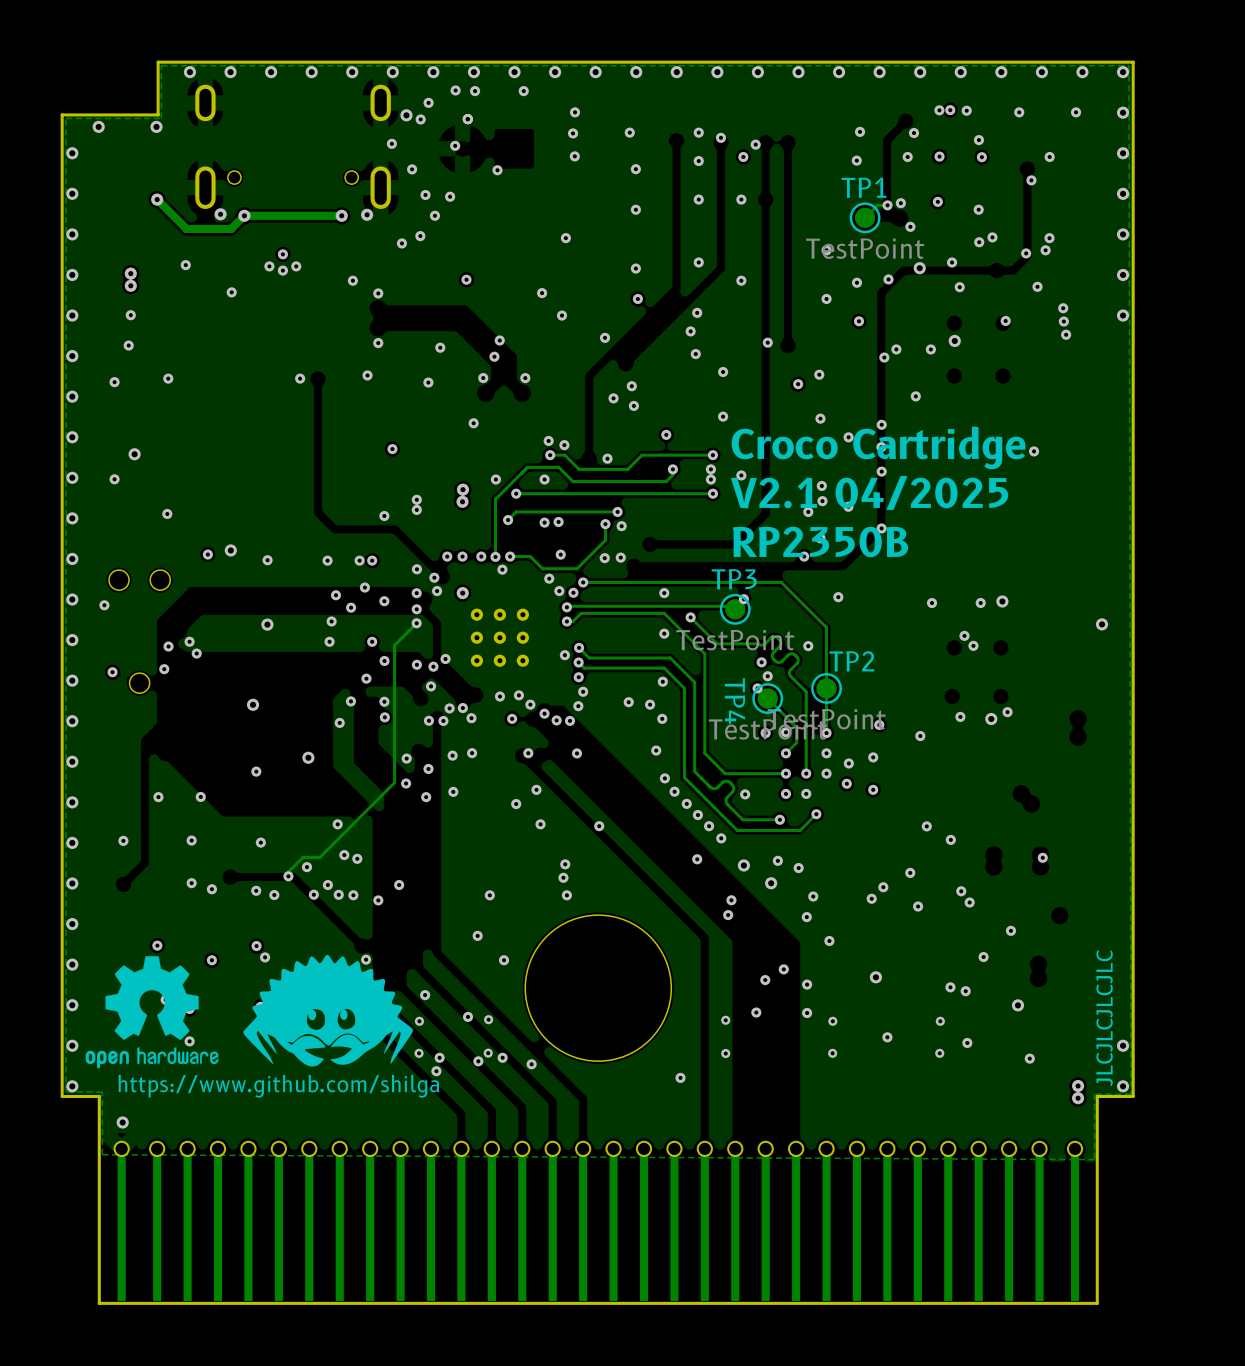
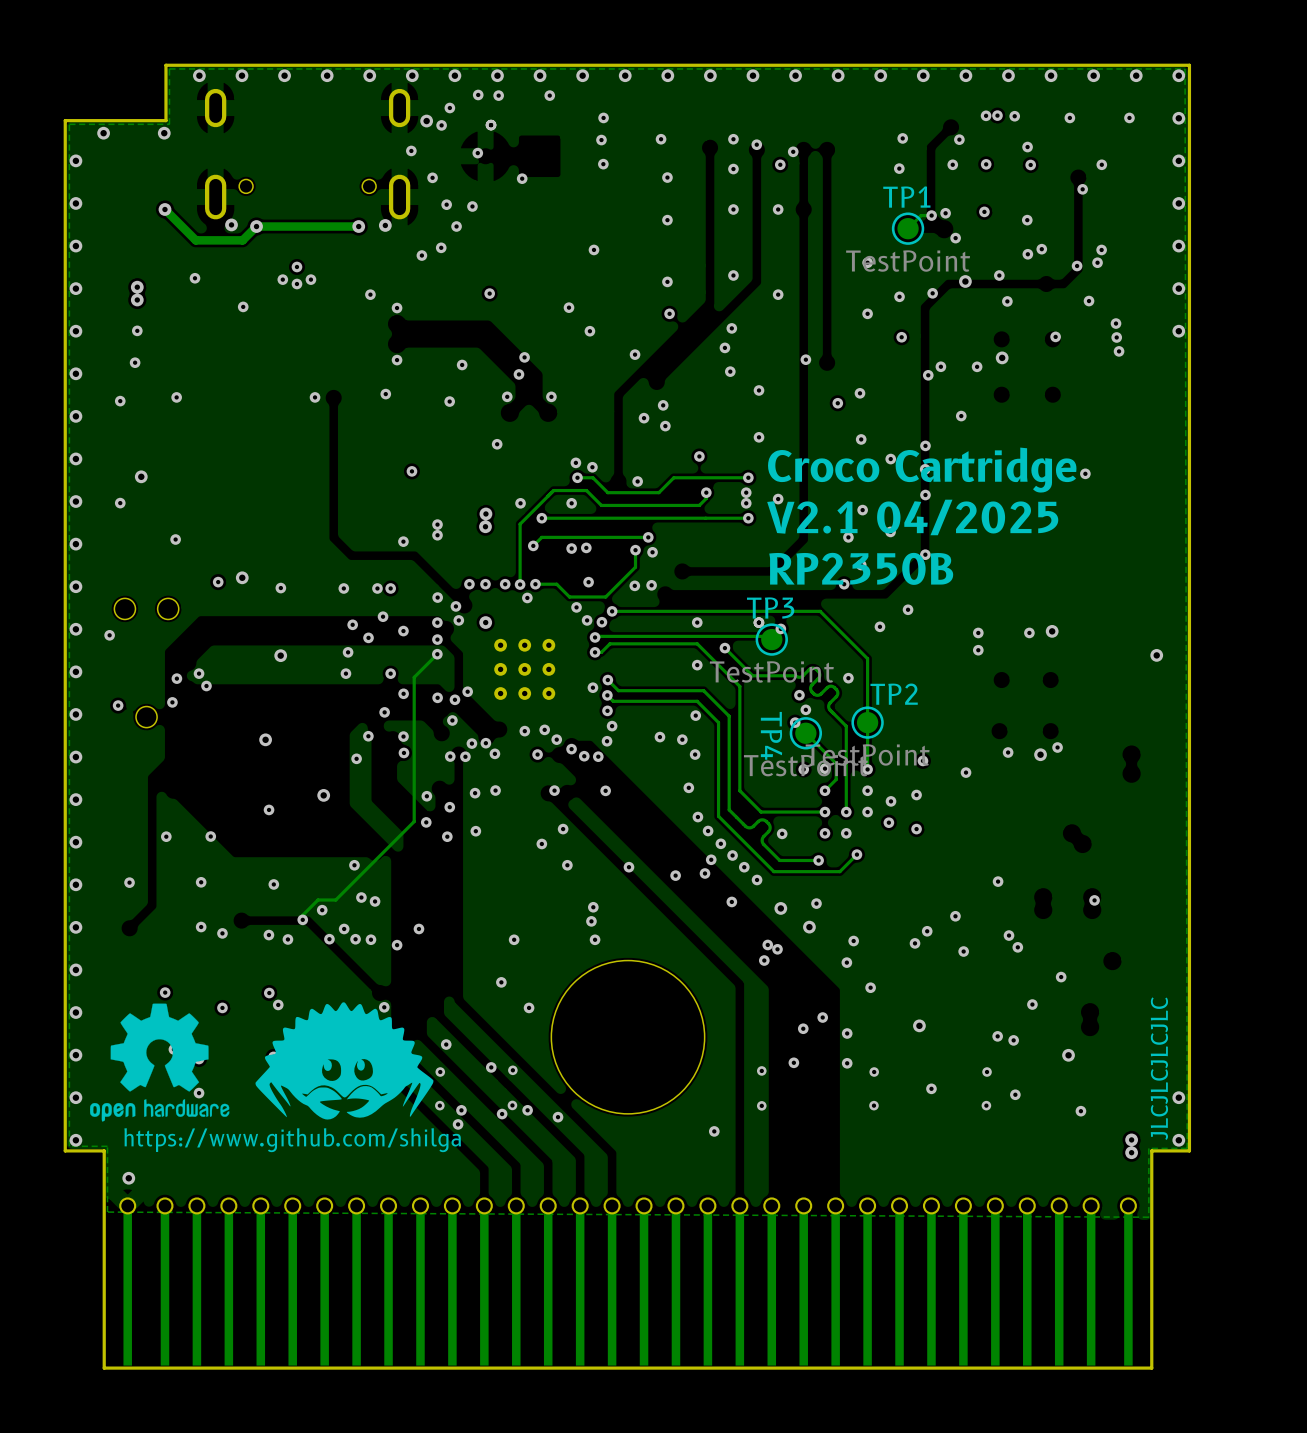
via: (822, 501) -> none
via: none -> (908, 609)
via: none -> (758, 622)
via: none -> (978, 650)
via: (964, 635) -> none
via: (973, 645) -> none
via: none -> (711, 859)
via: (926, 826) -> none
via: none -> (705, 873)
via: none -> (675, 875)
via: (798, 868) -> none
via: none -> (777, 949)

